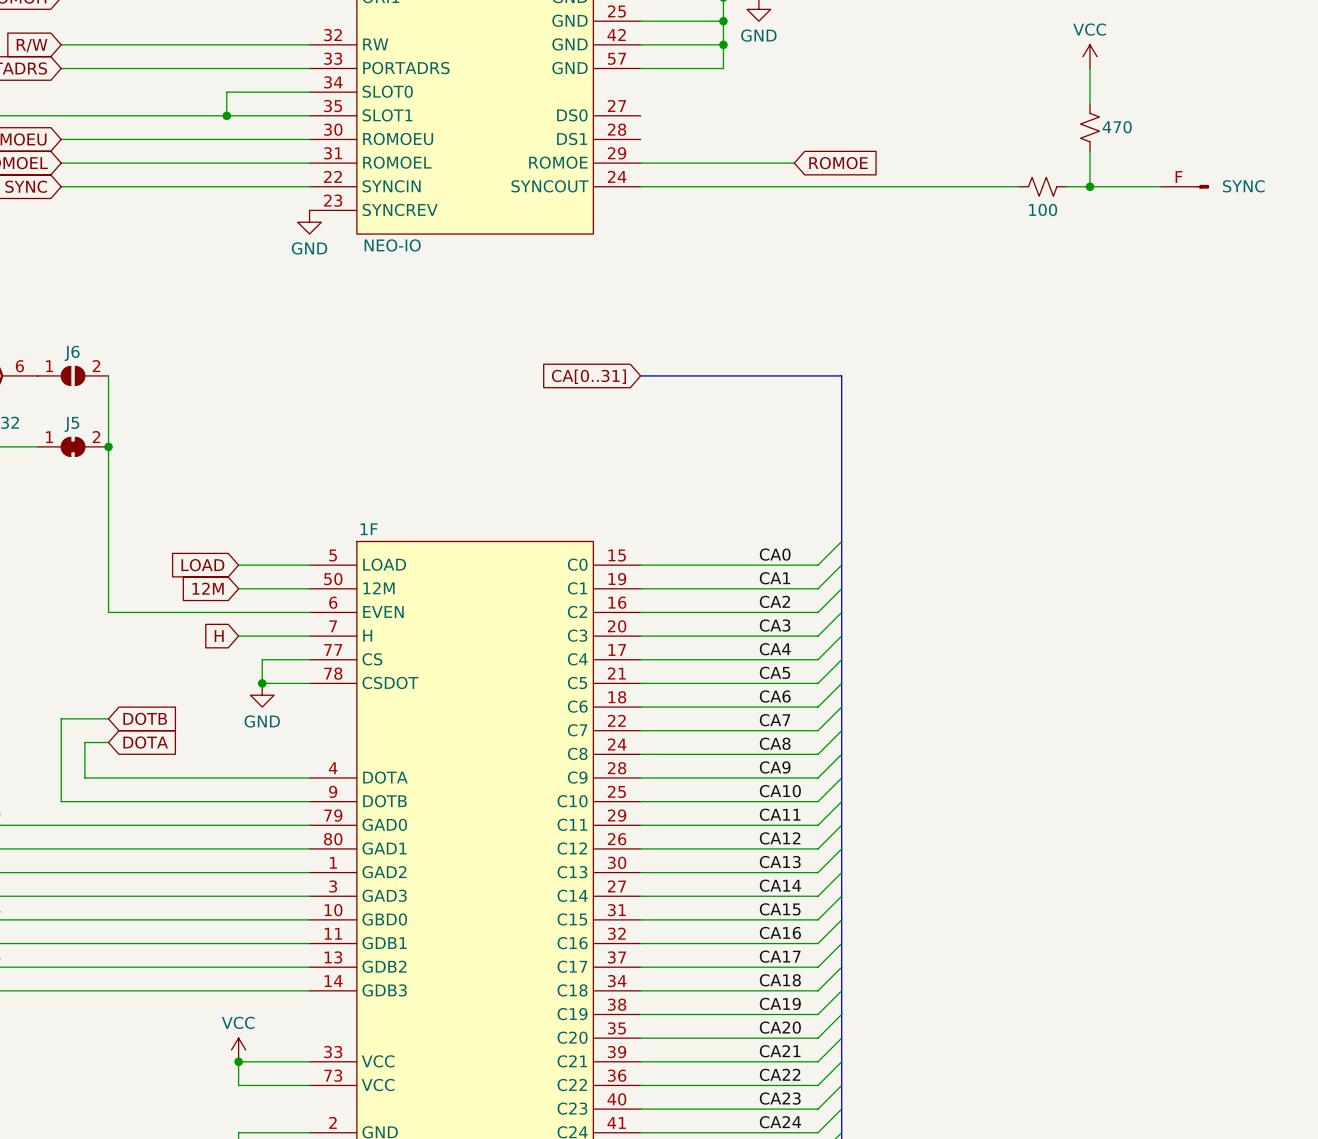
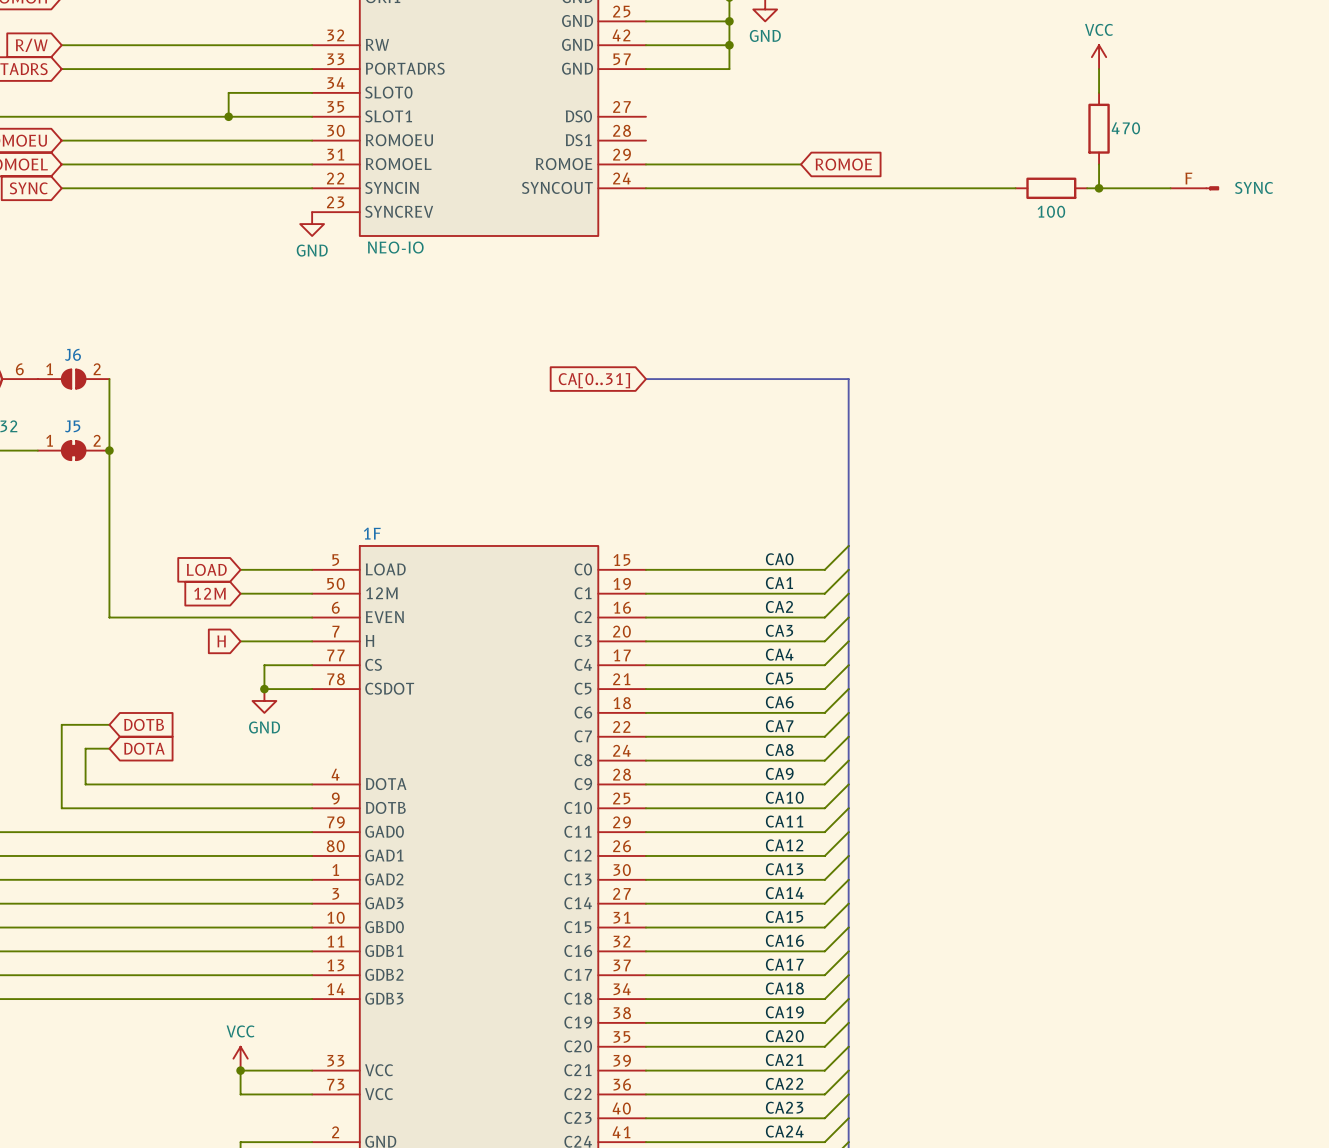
part symbol: [1080, 103, 1100, 152] -> [1088, 92, 1110, 165]
part symbol: [1019, 177, 1067, 197] -> [1015, 177, 1088, 200]

